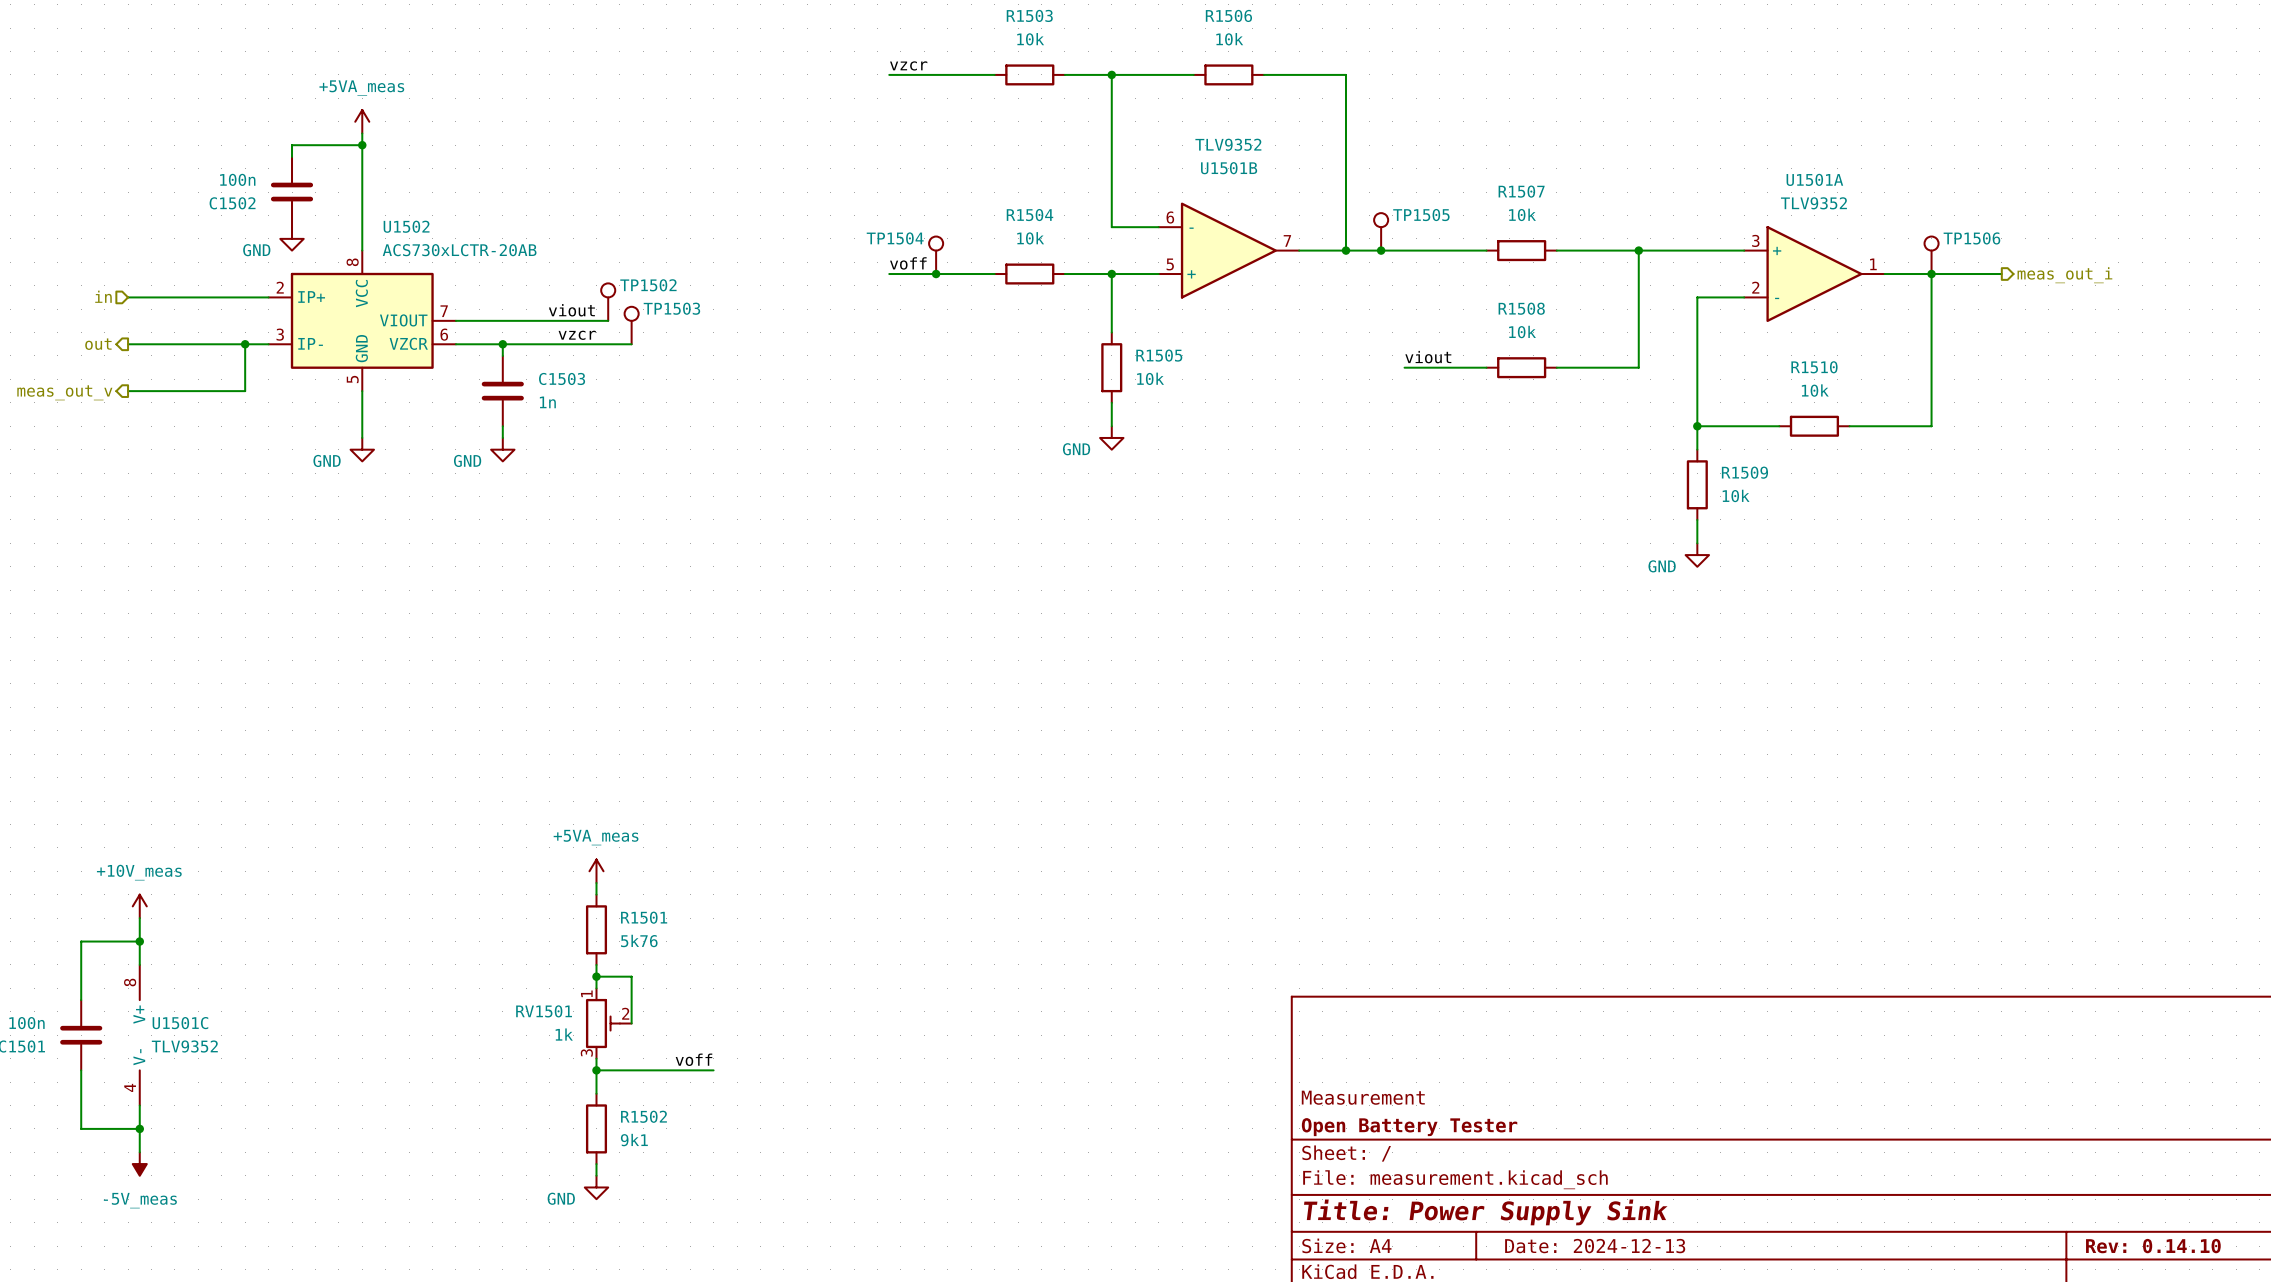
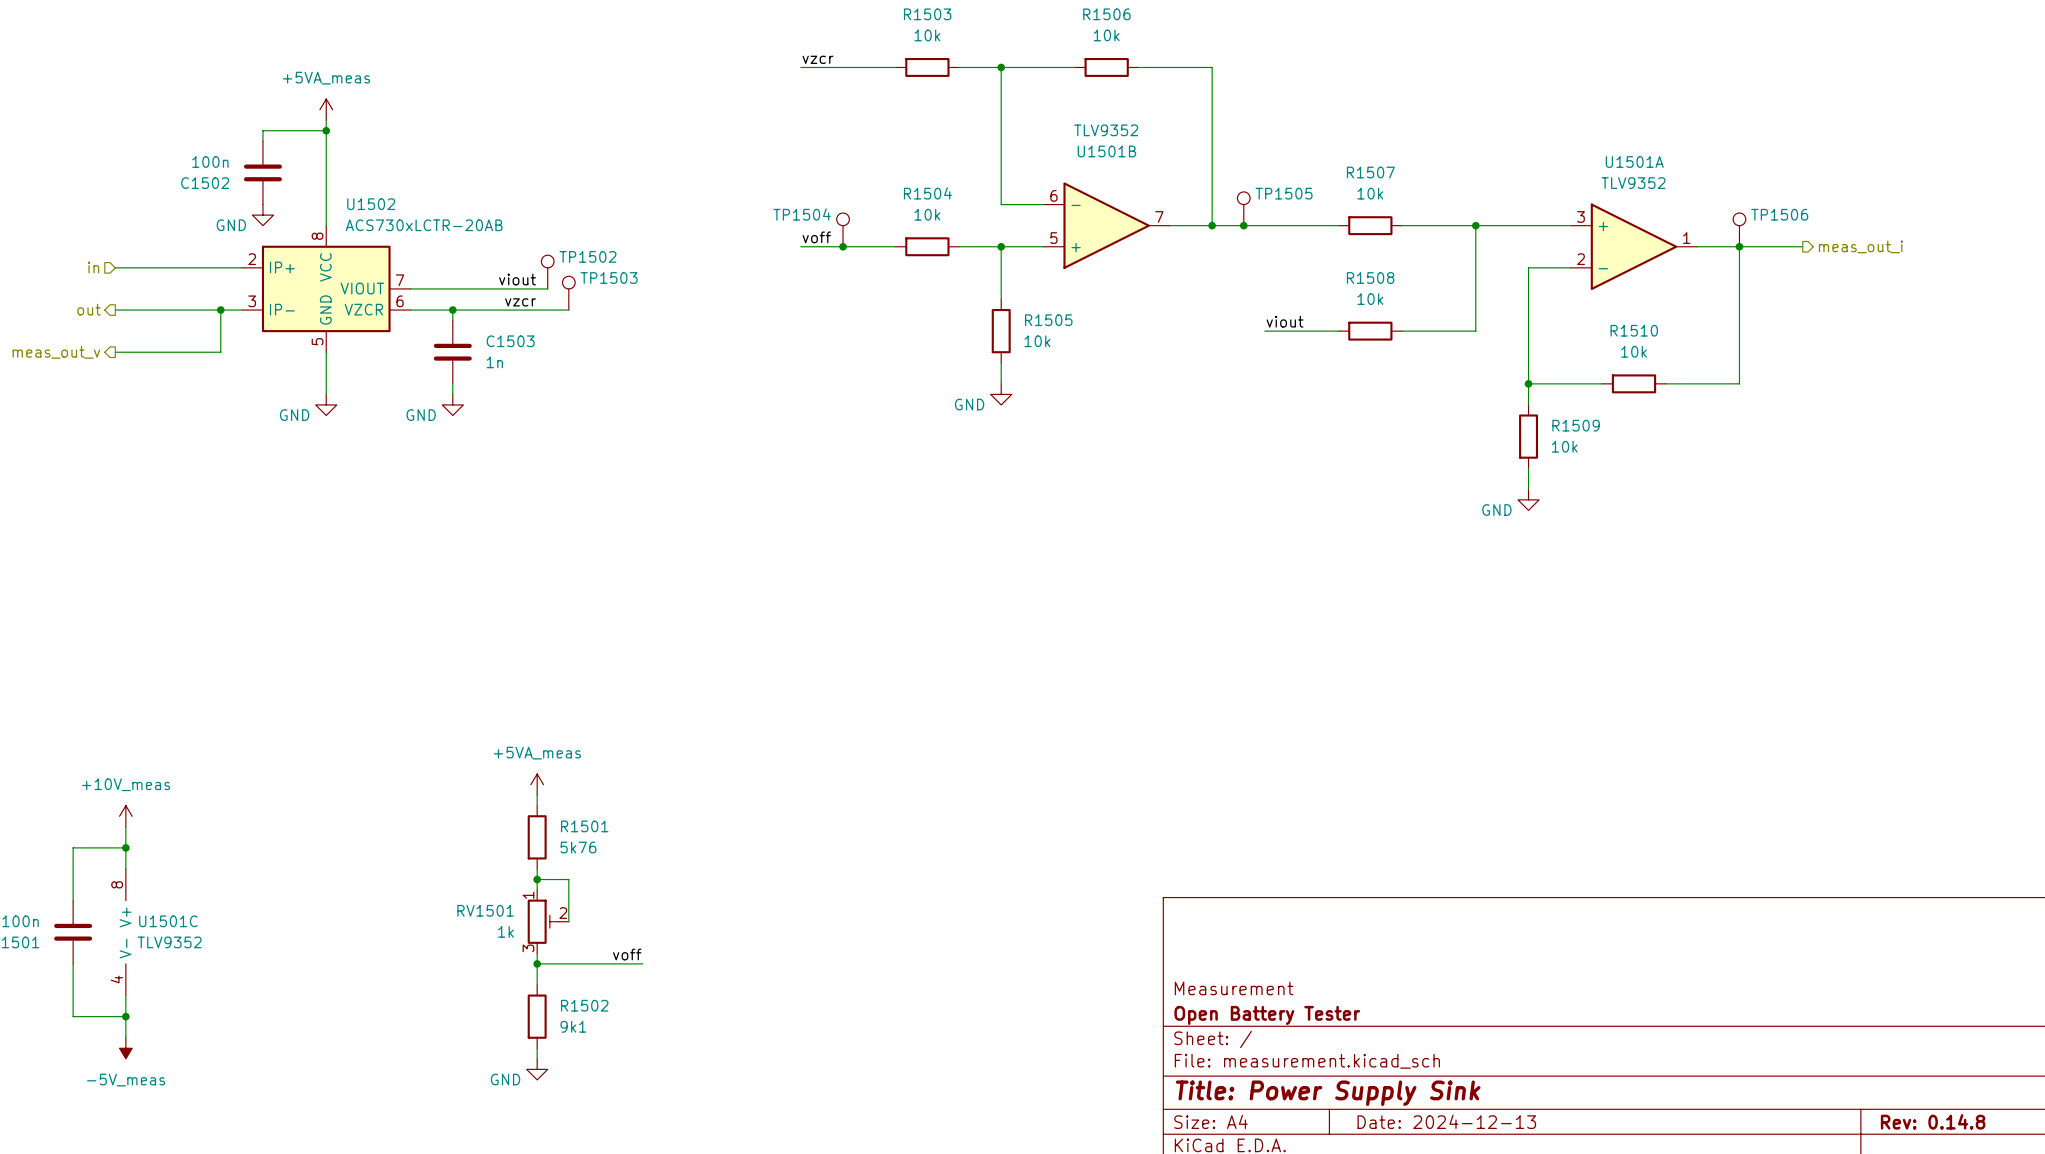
title block: Rev: 0.14.10 (2153, 1246) -> Rev: 0.14.8 (1933, 1121)

